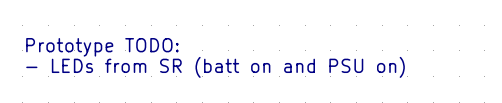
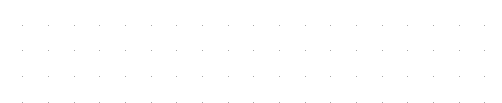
text: Prototype TODO: (102, 47) -> none
text: - LEDs from SR (batt on and PSU on) (215, 67) -> none

